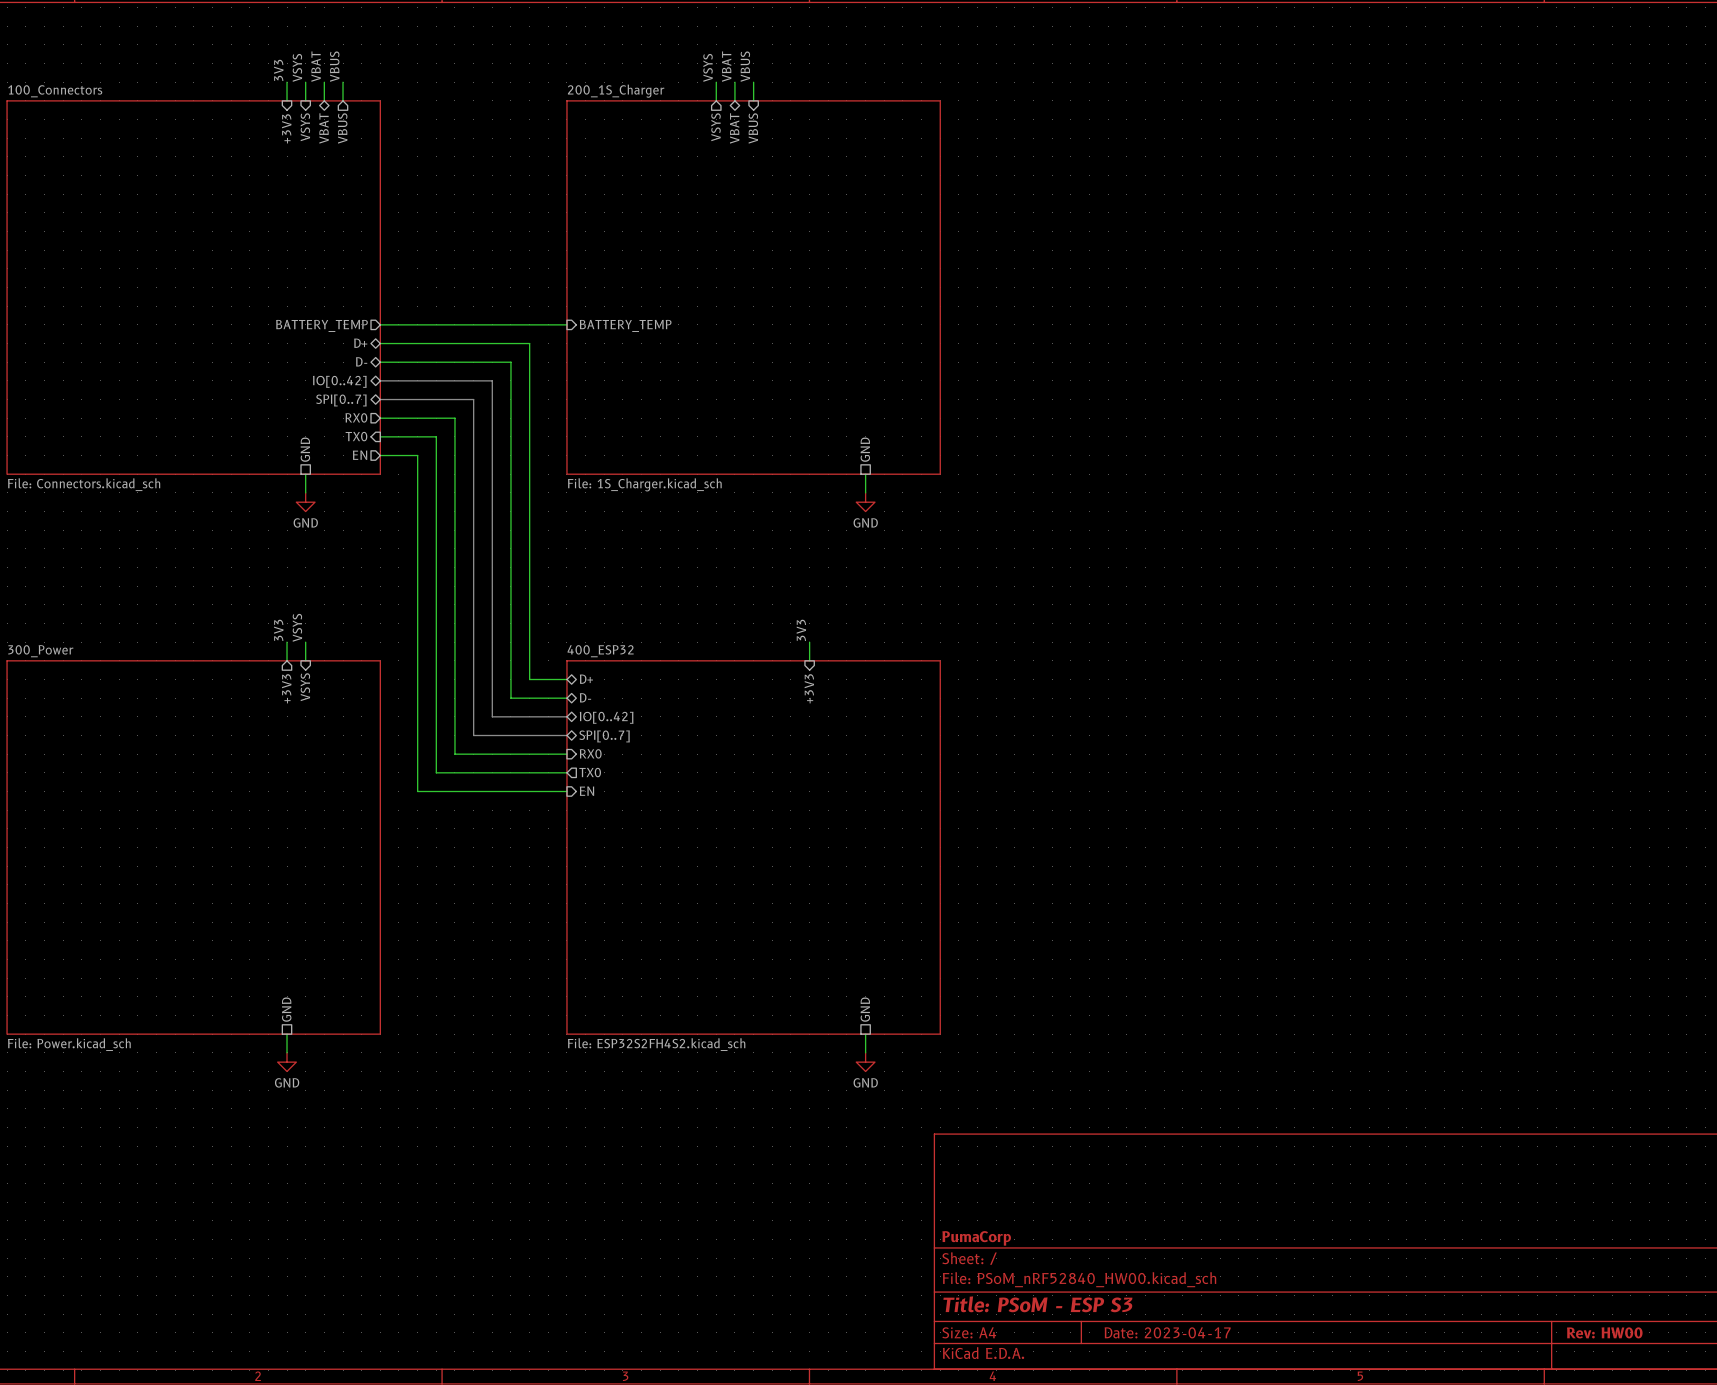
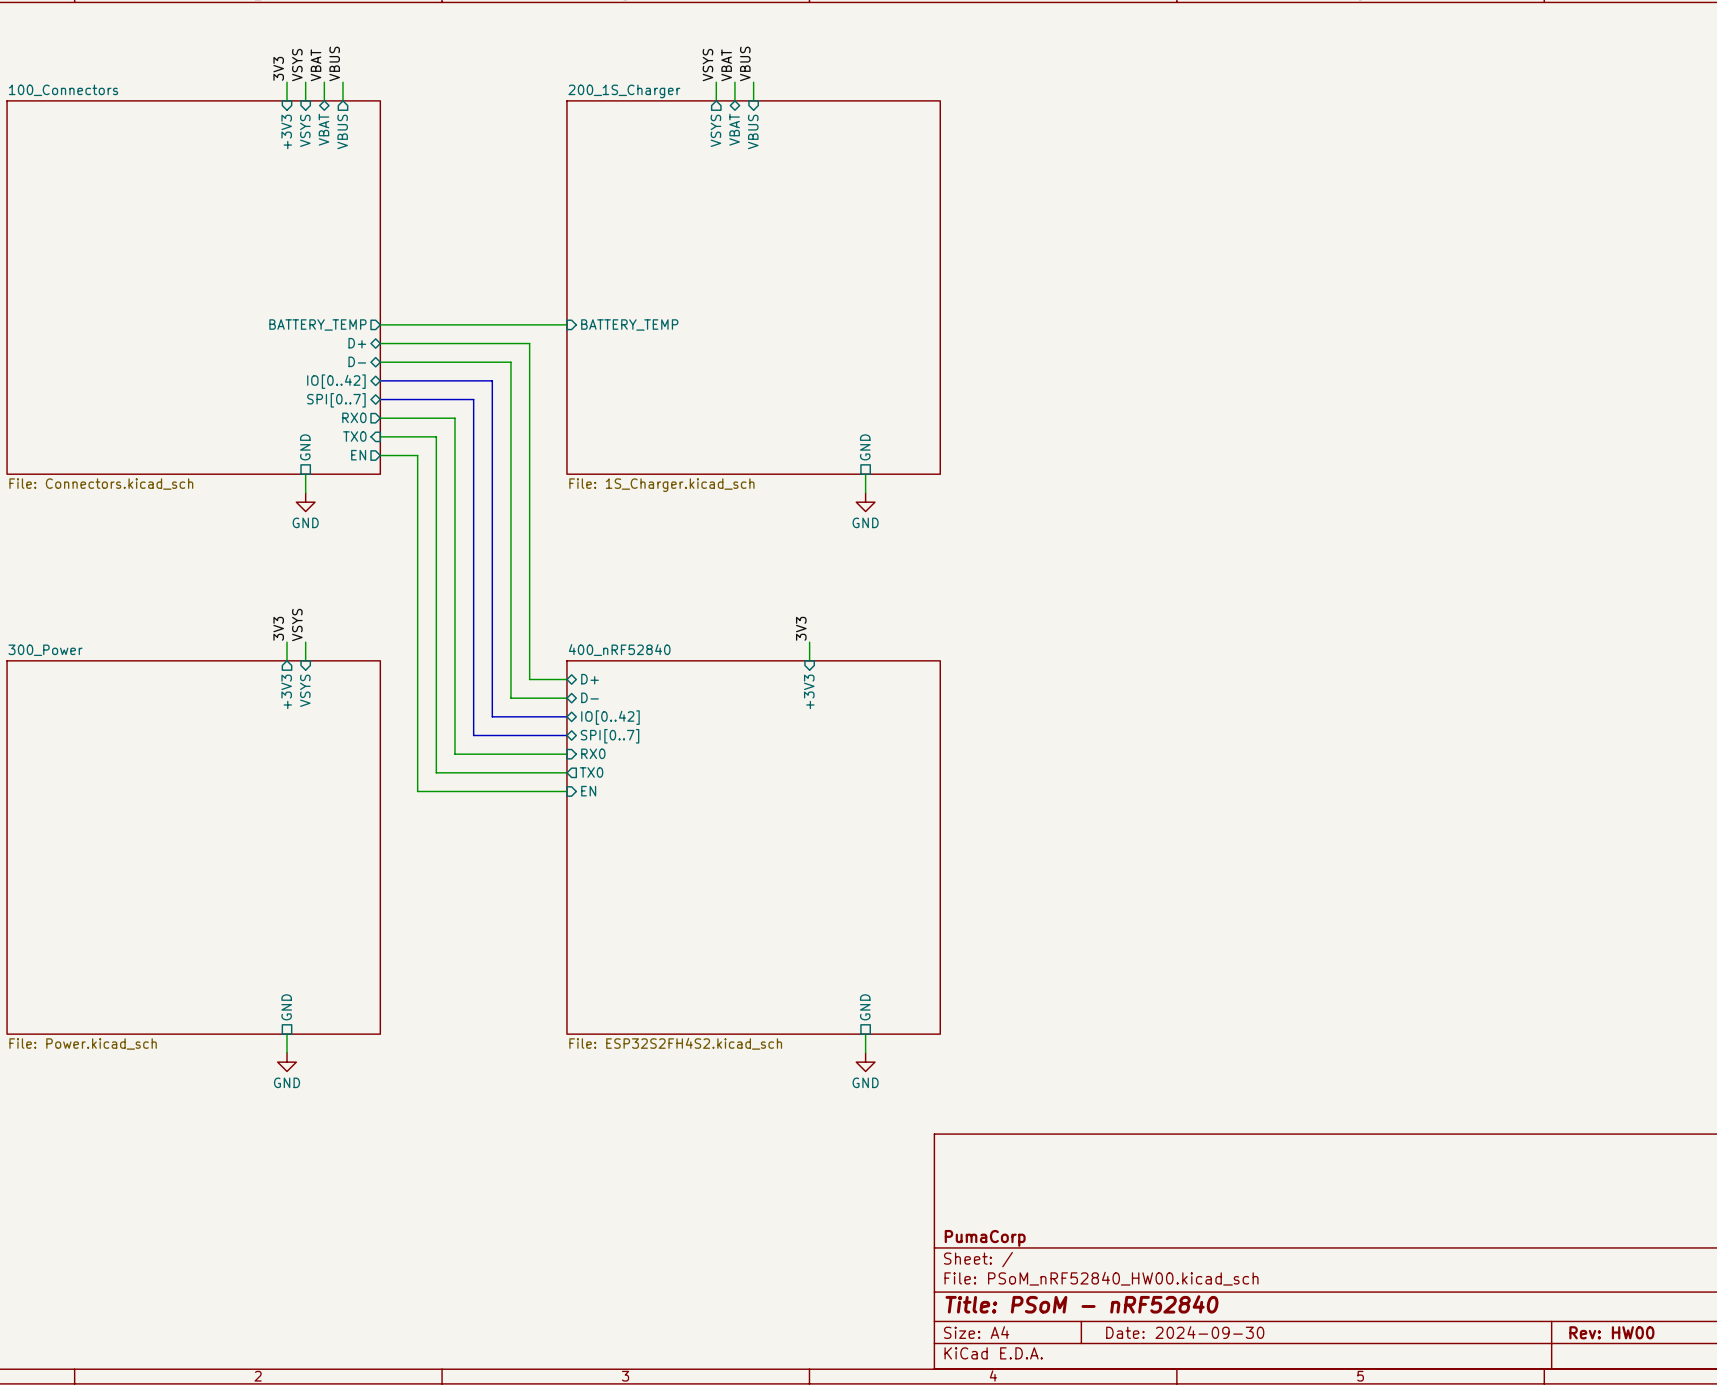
sheet 400_ESP32 name: 400_ESP32 (600, 651) -> 400_nRF52840 (619, 650)
title block: Title: PSoM - ESP S3 (1037, 1304) -> Title: PSoM - nRF52840 (1081, 1304)
title block: Date: 2023-04-17 (1167, 1332) -> Date: 2024-09-30 (1185, 1332)

